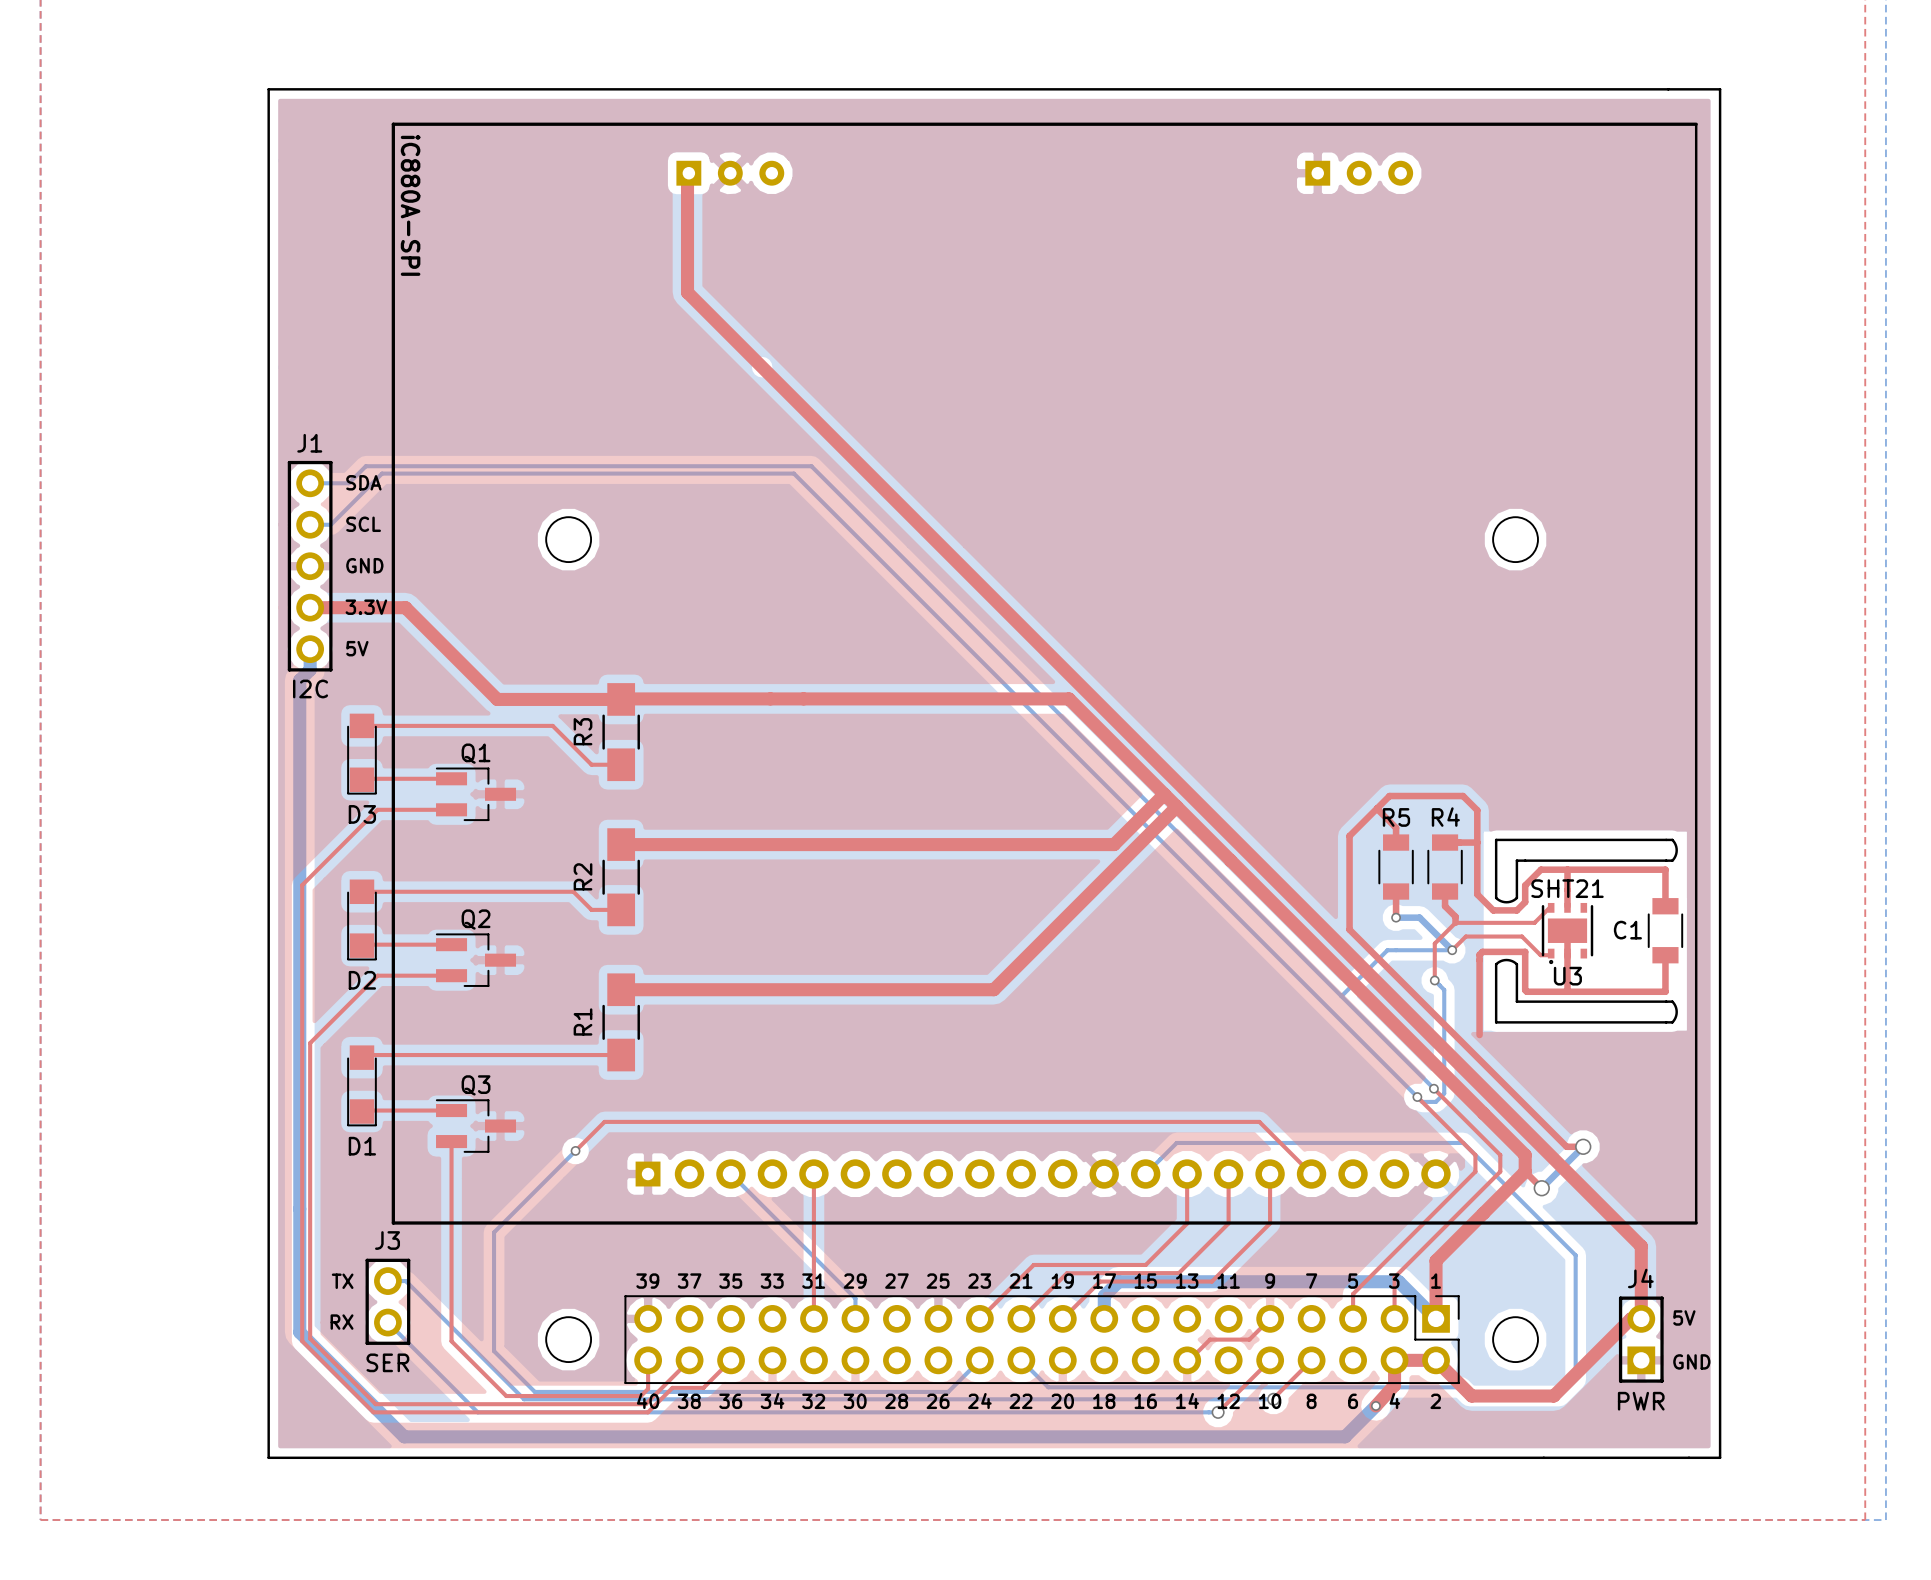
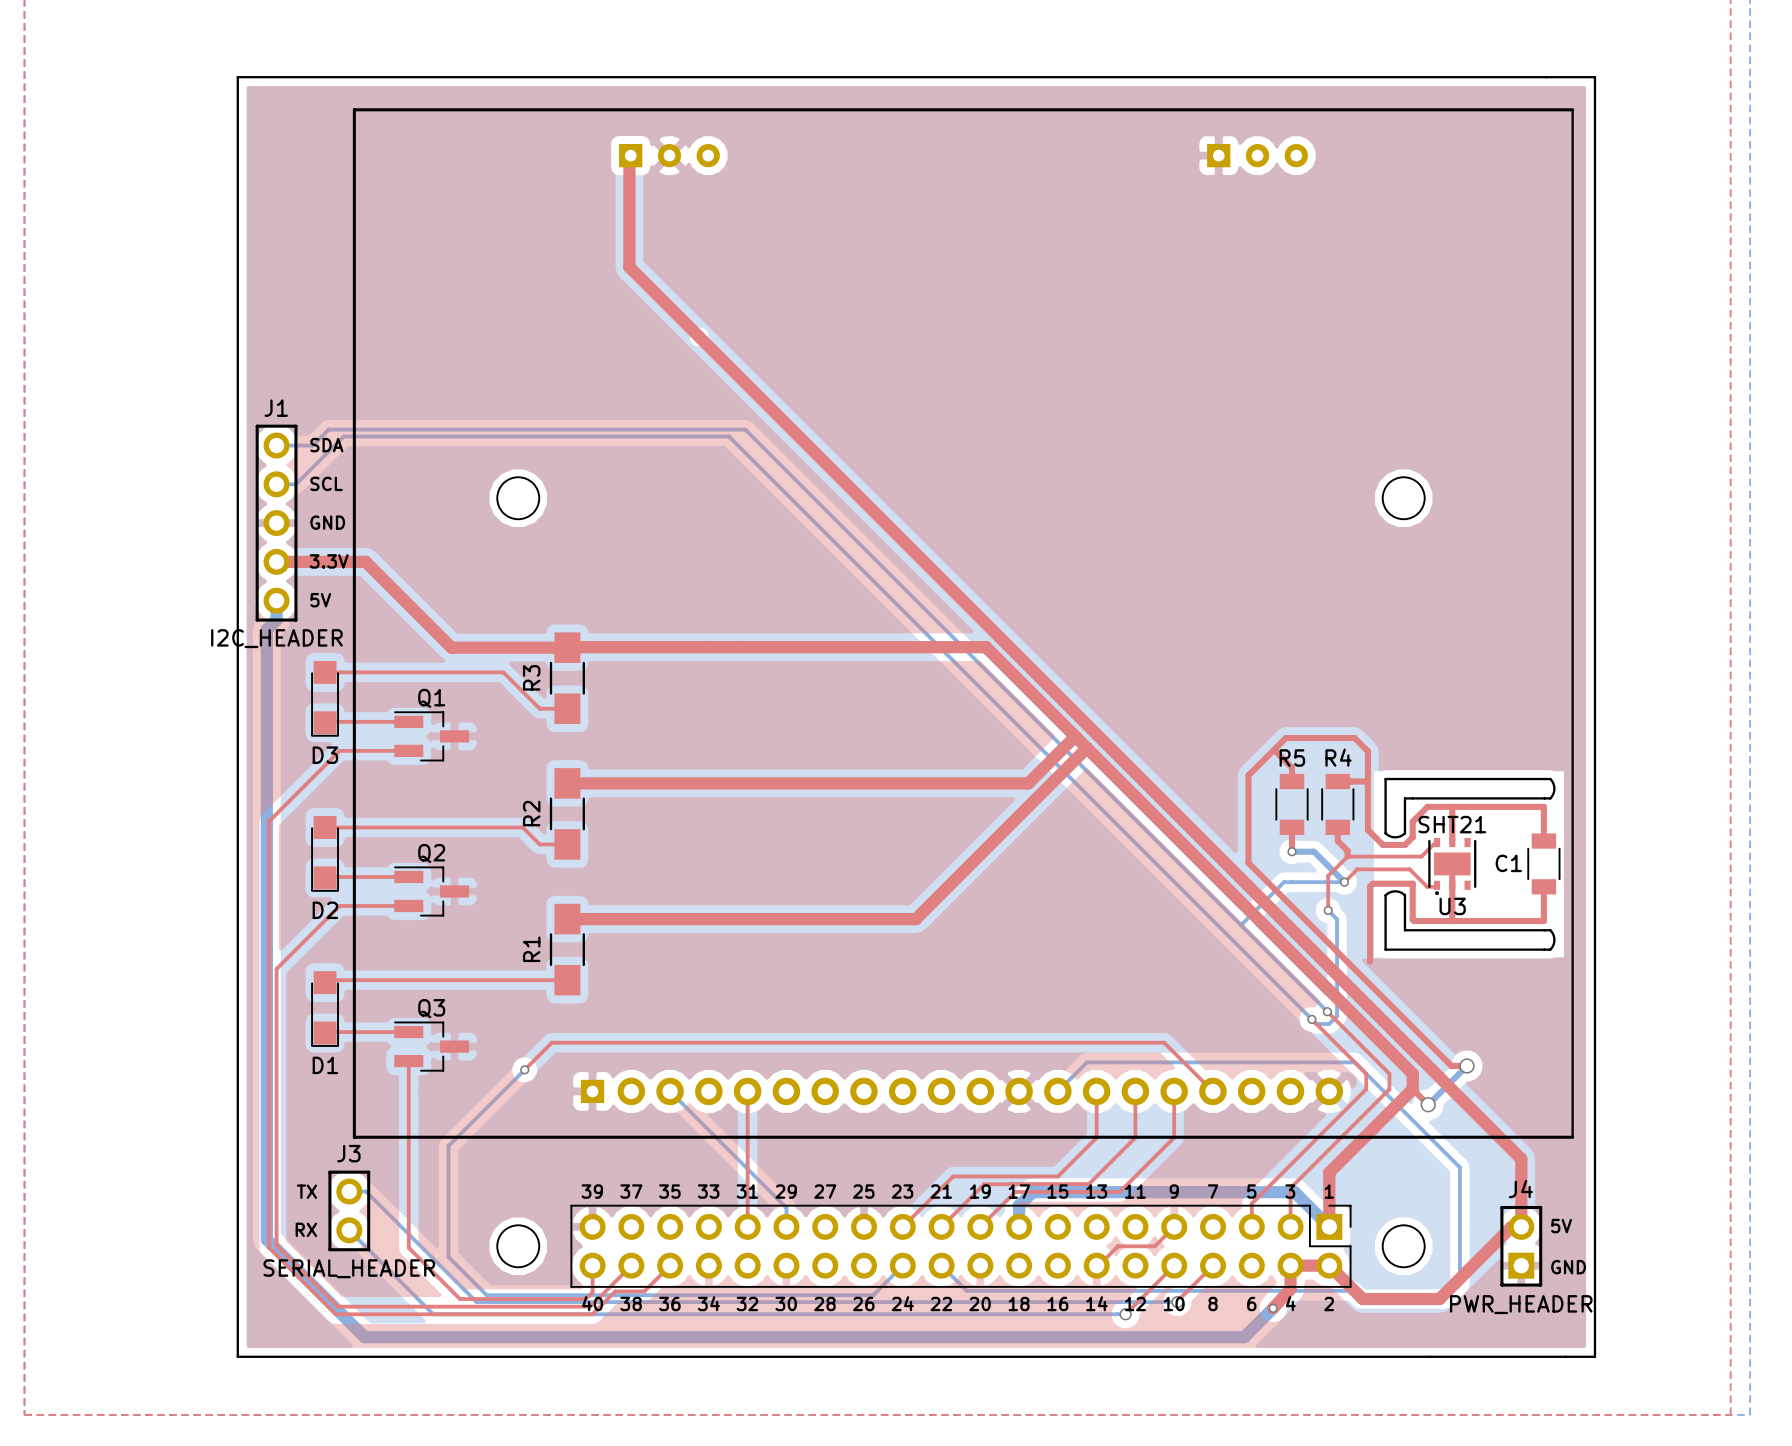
text: iC880A-SPI (410, 205) -> none
J1 value: I2C (310, 688) -> I2C_HEADER (276, 638)
J3 value: SER (387, 1362) -> SERIAL_HEADER (349, 1268)
J4 value: PWR (1641, 1401) -> PWR_HEADER (1521, 1304)

